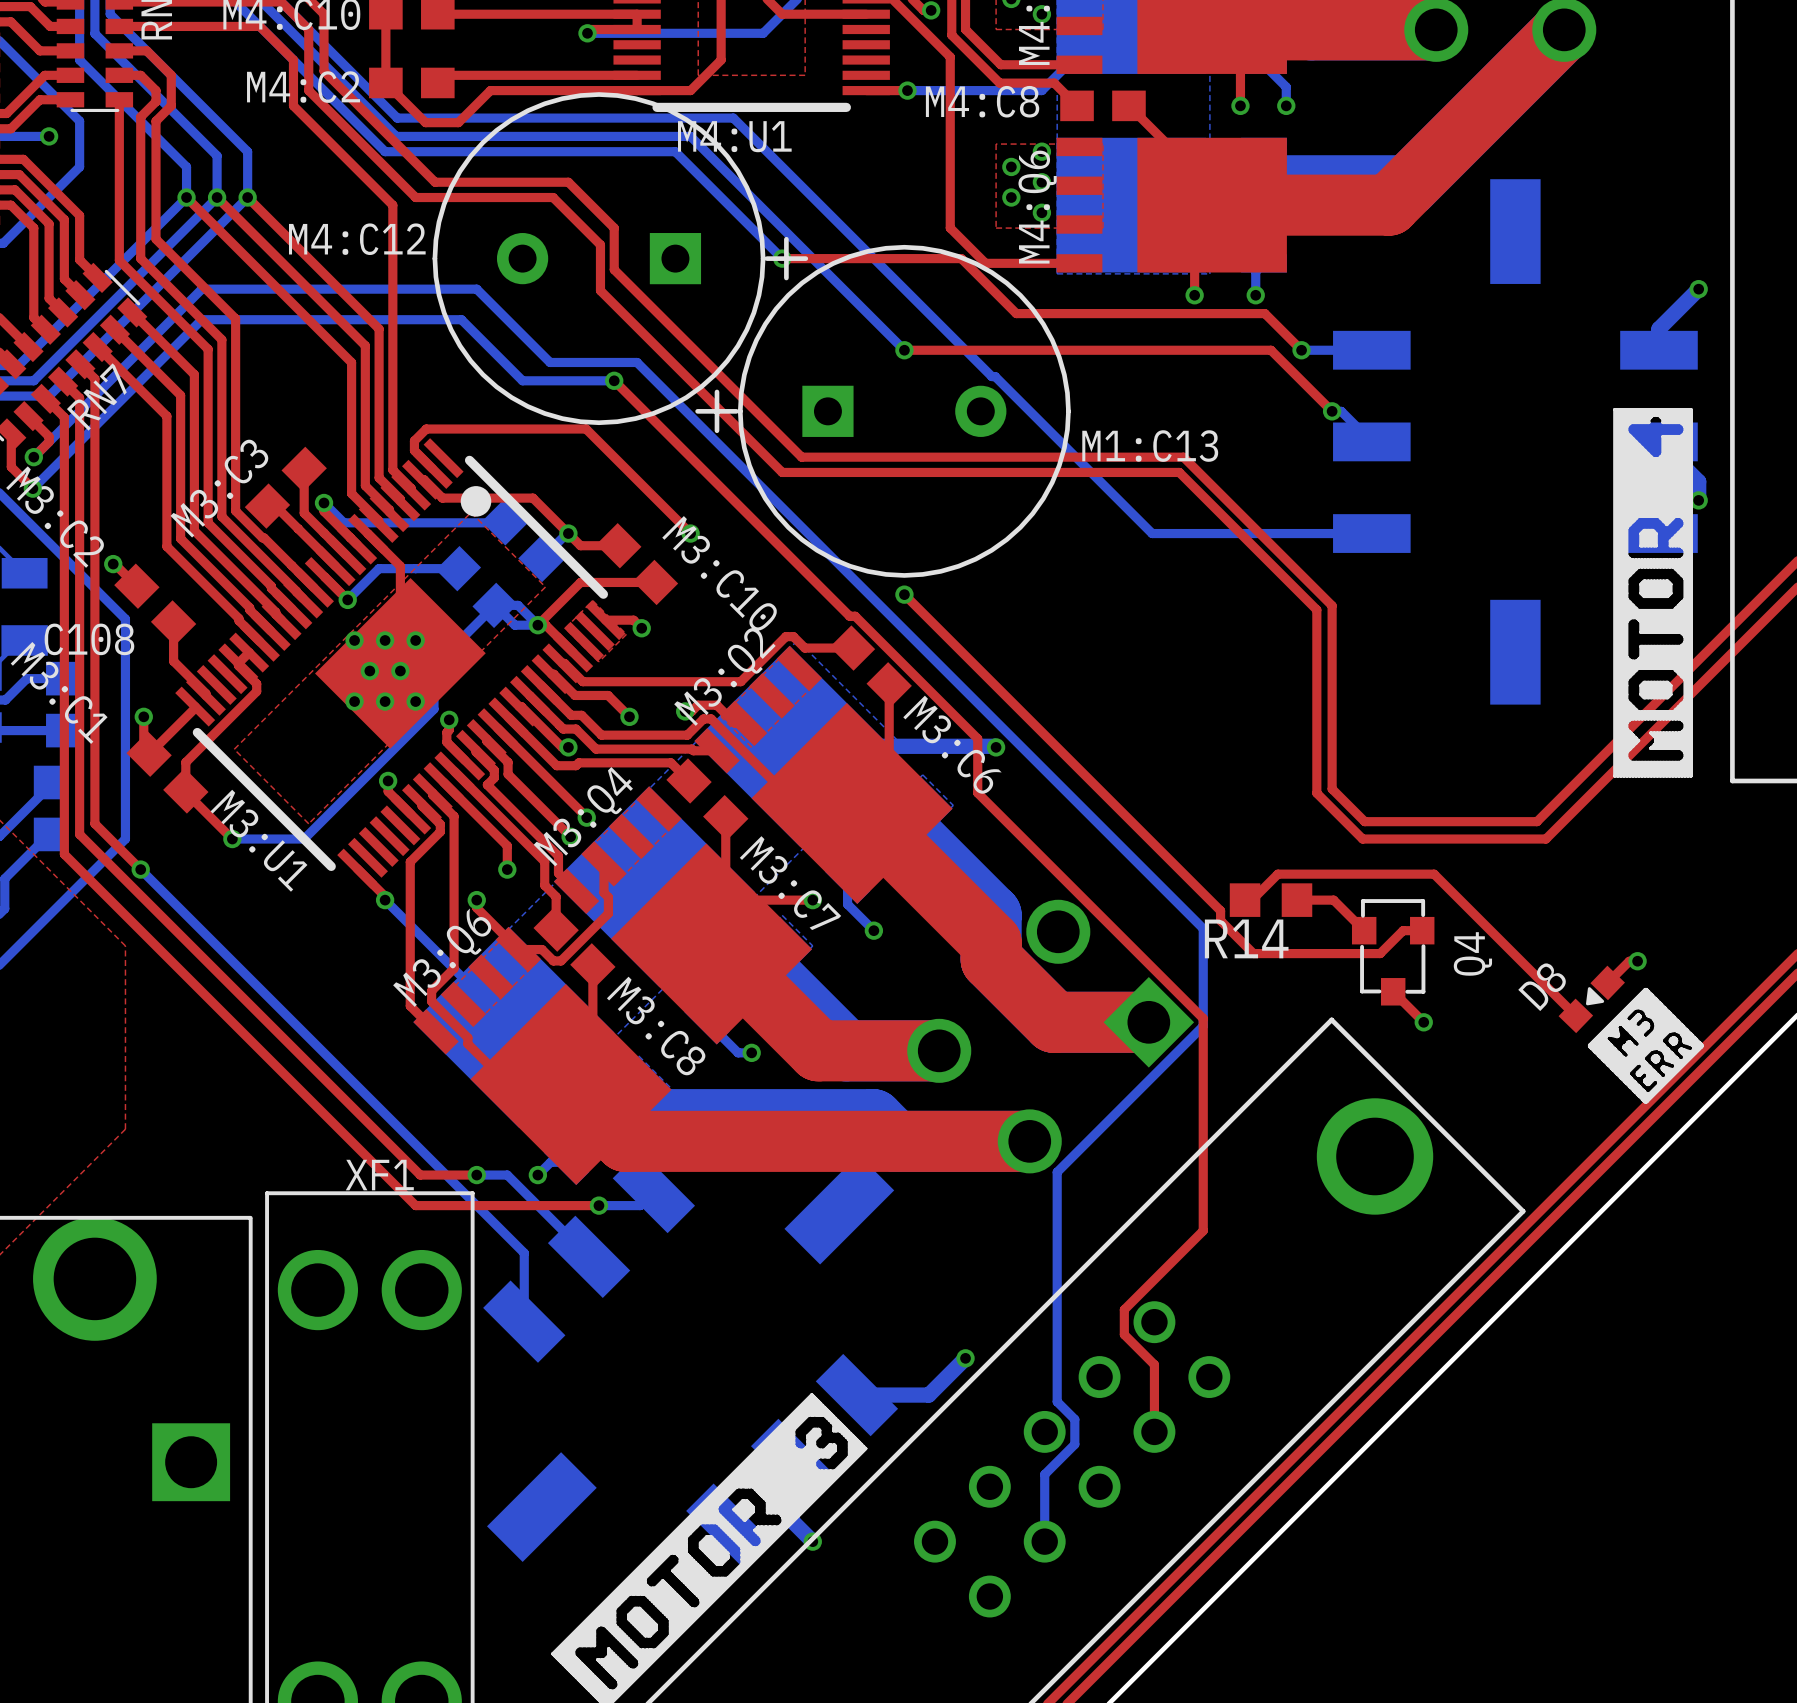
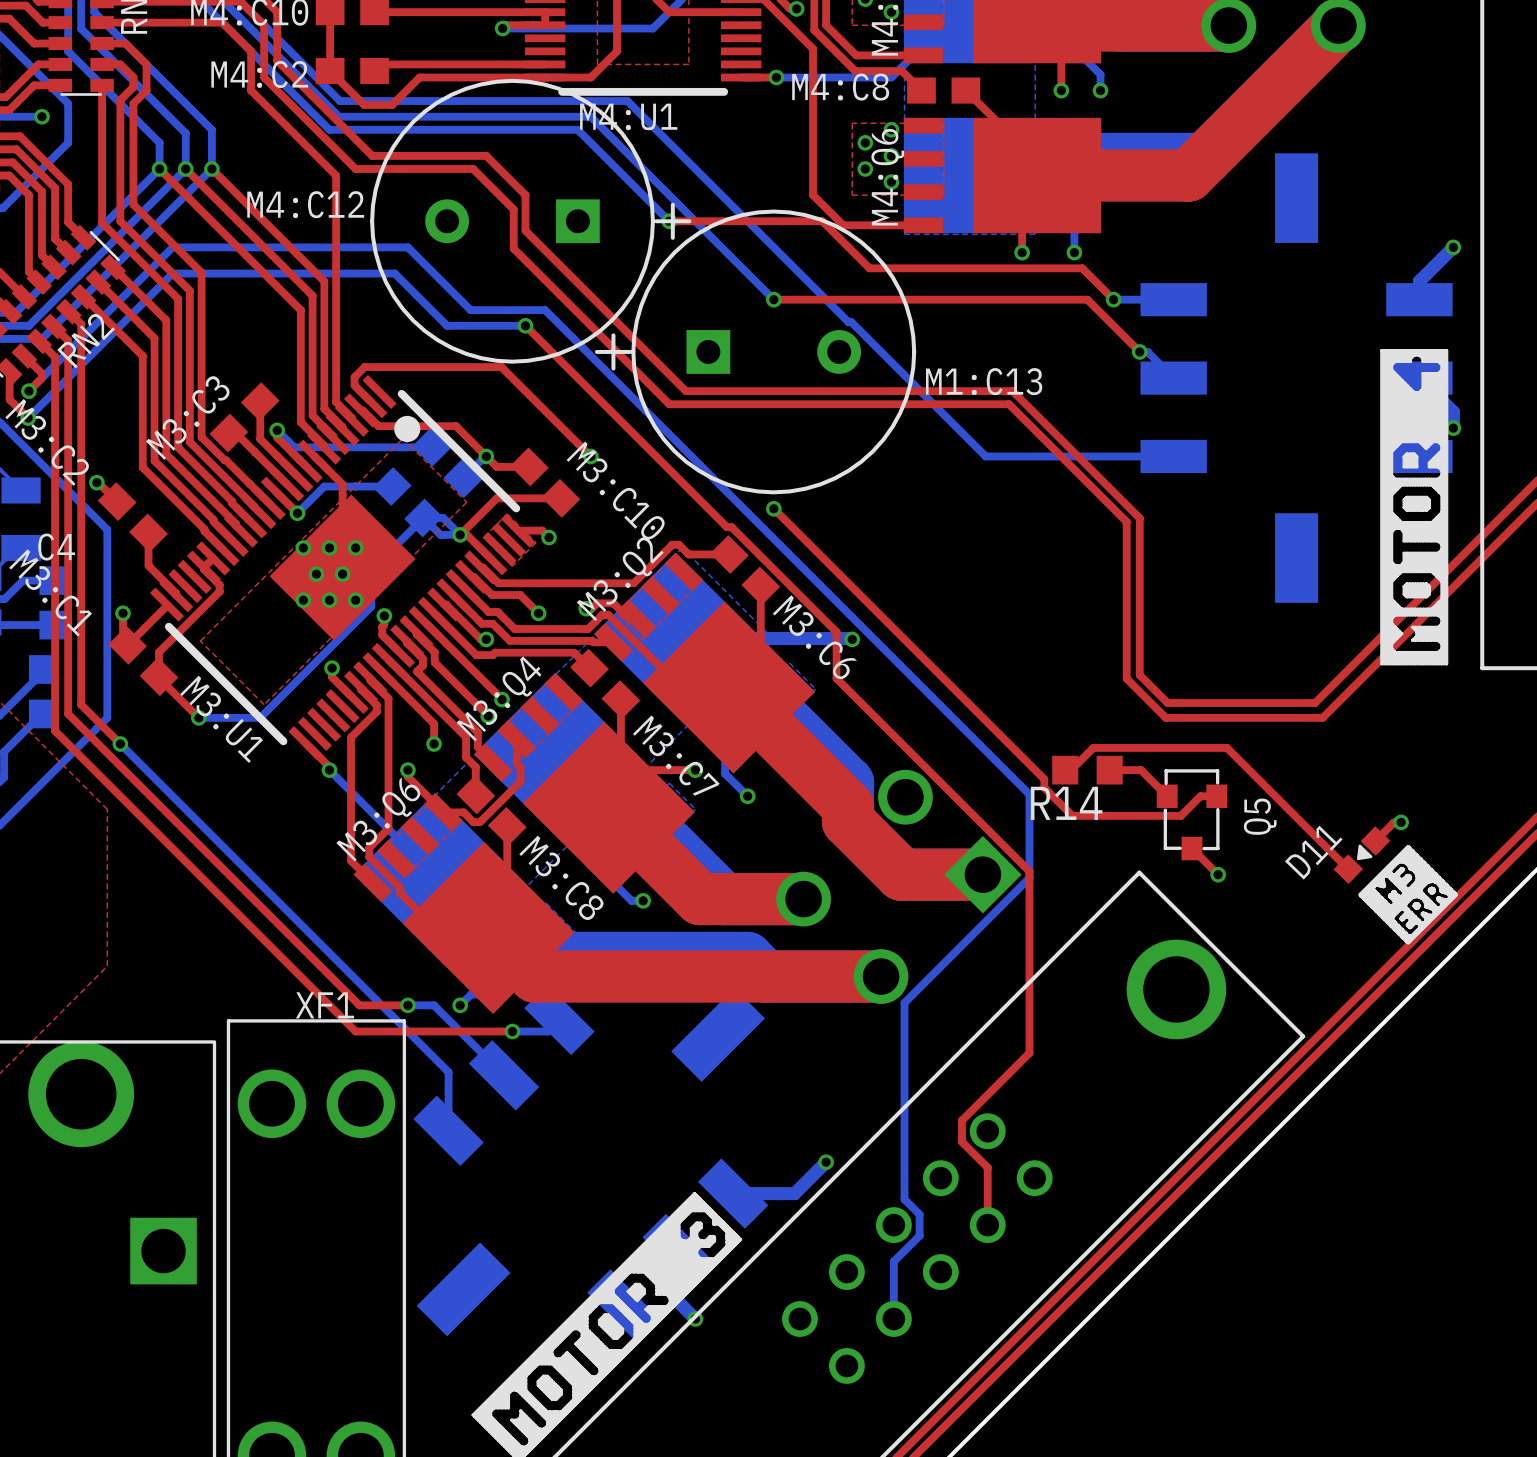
RN7 name: RN7 (96, 397) -> RN2 (86, 341)
C108 name: C108 (89, 639) -> C4 (56, 547)
Q4 name: Q4 (1472, 953) -> Q5 (1260, 816)
D8 name: D8 (1542, 987) -> D11 (1313, 852)

